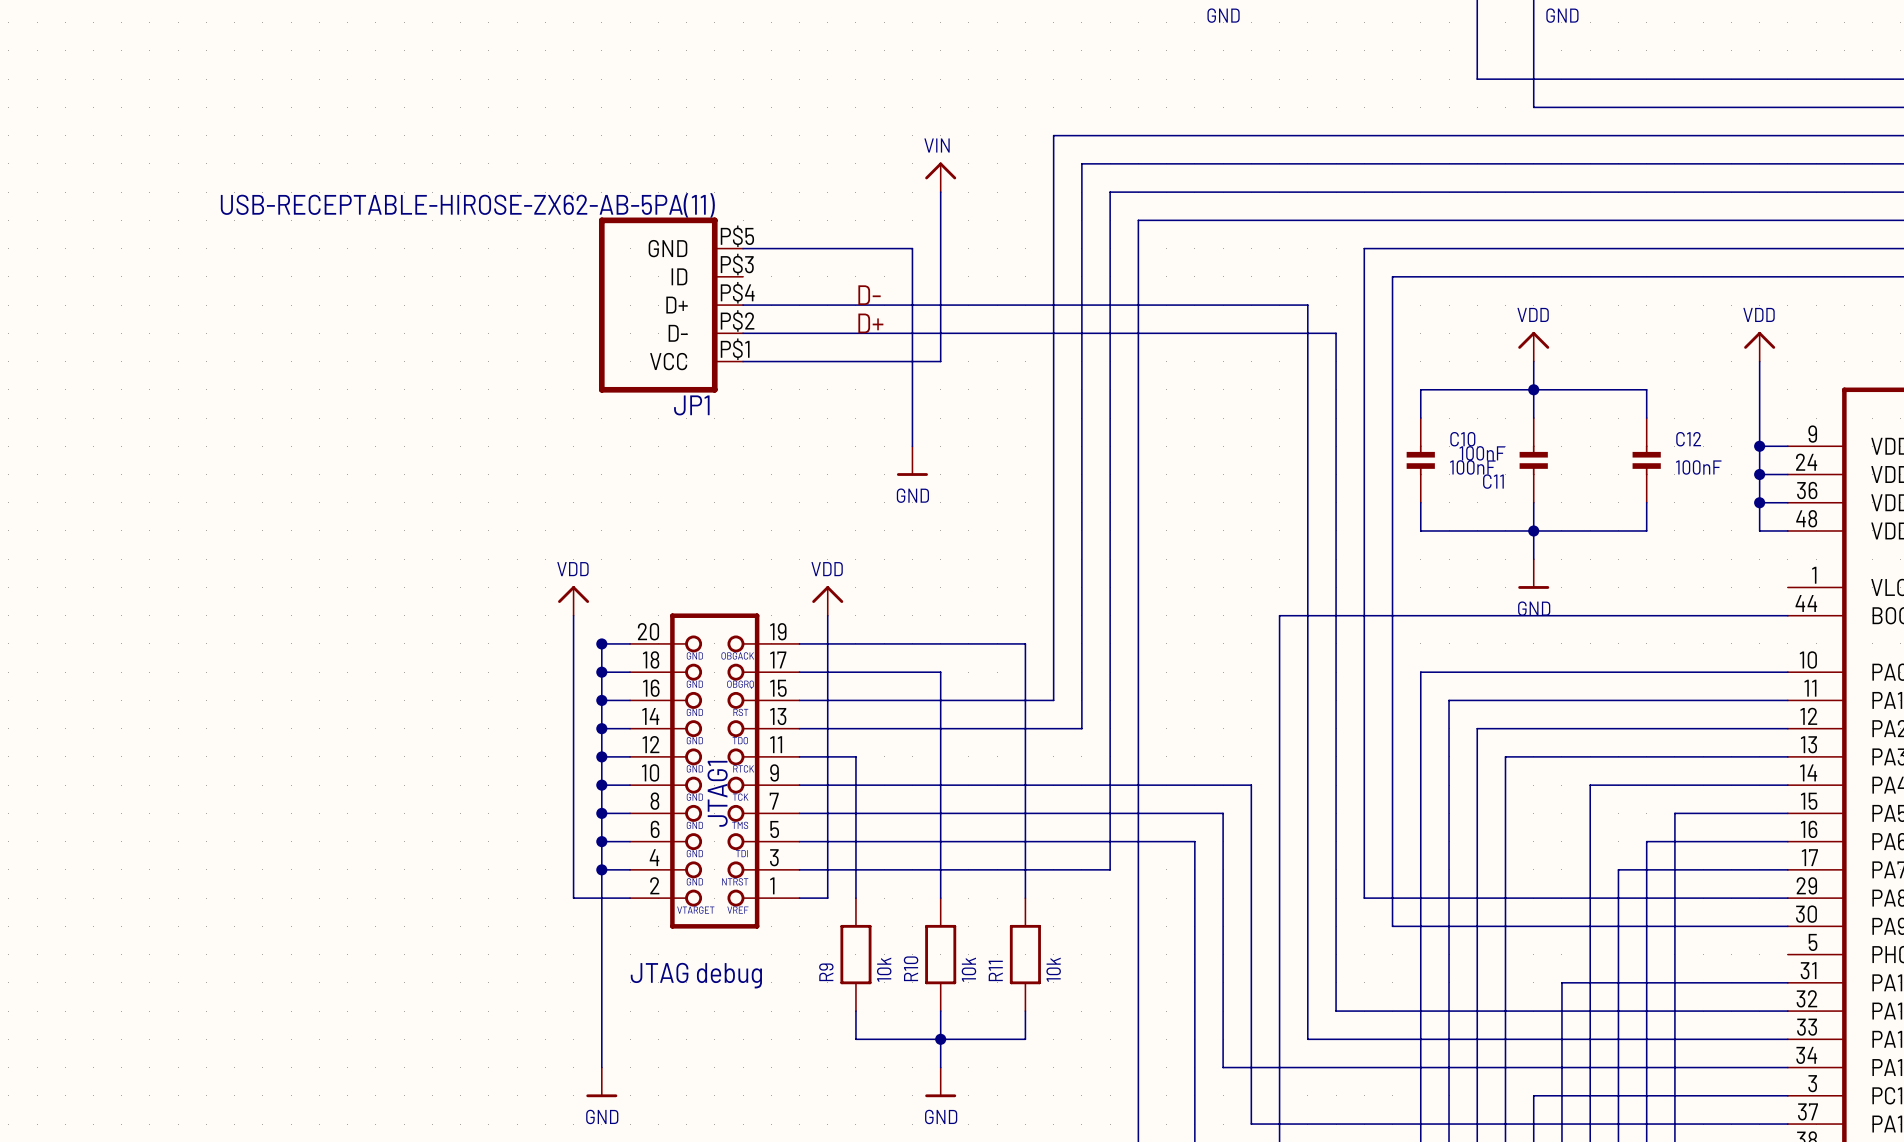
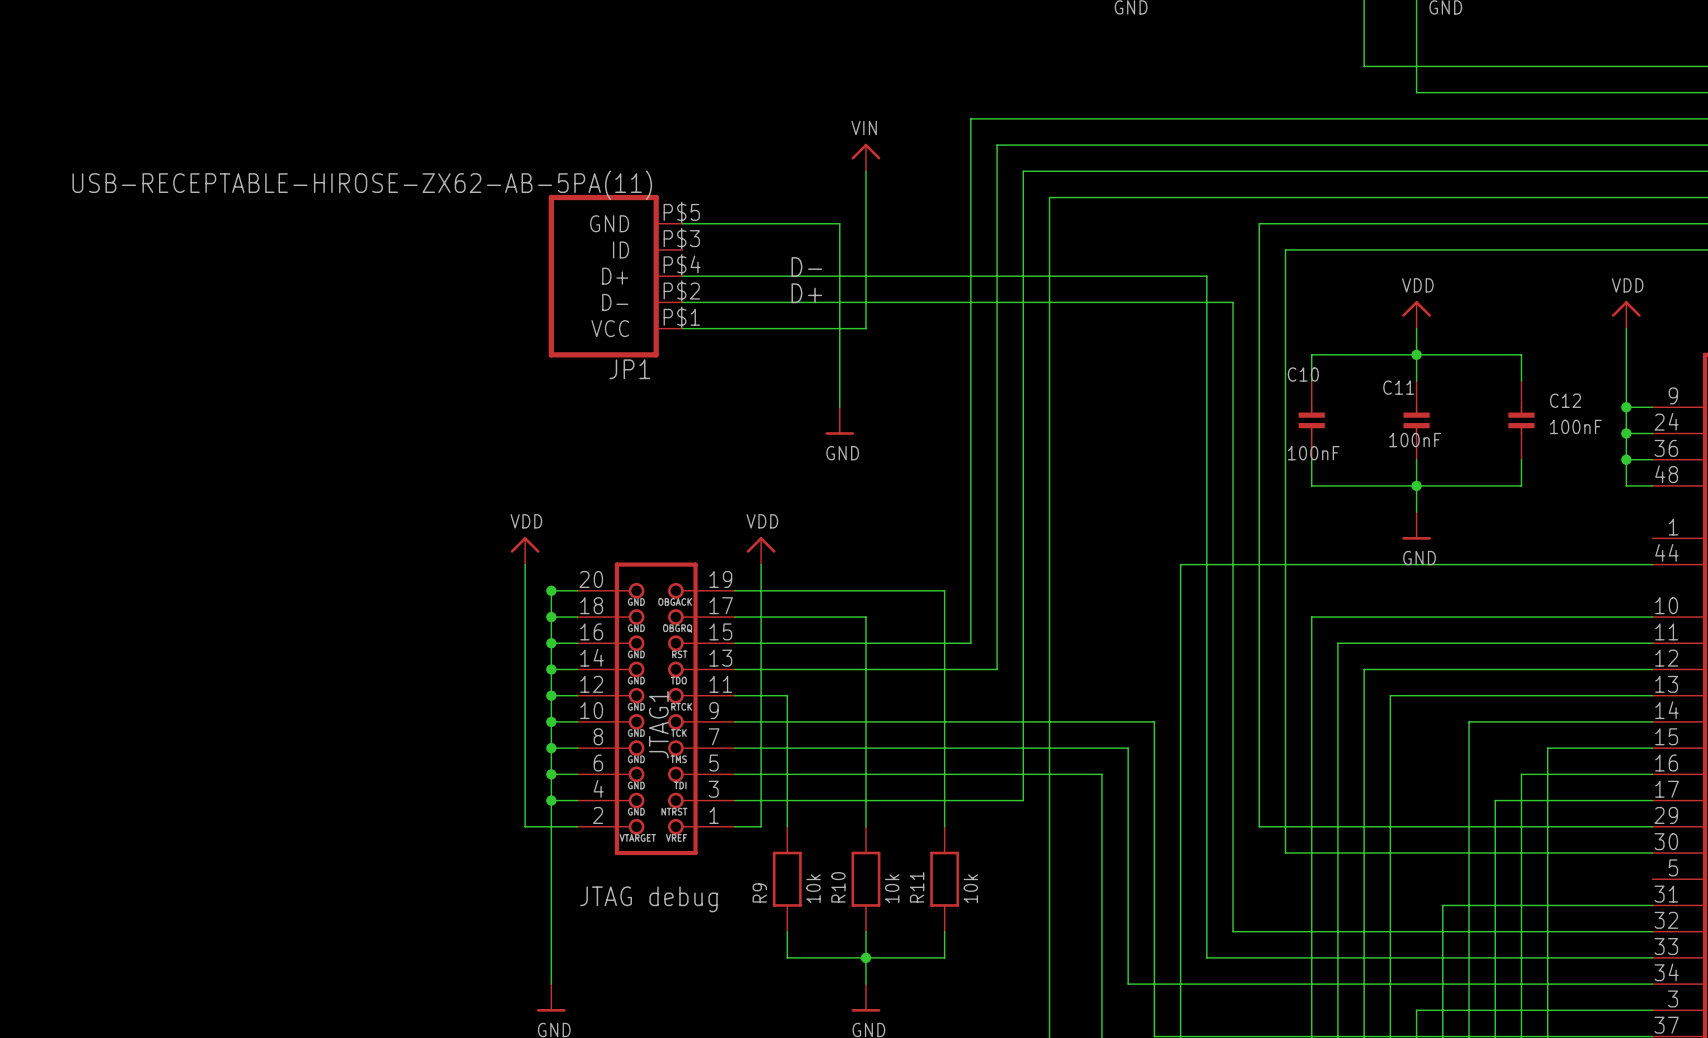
C10 name position: C10 (1462, 439) -> C10 (1303, 374)
C11 value position: 100nF (1482, 453) -> 100nF (1415, 440)
C10 value position: 100nF (1472, 467) -> 100nF (1313, 453)
C11 name position: C11 (1493, 481) -> C11 (1398, 387)

